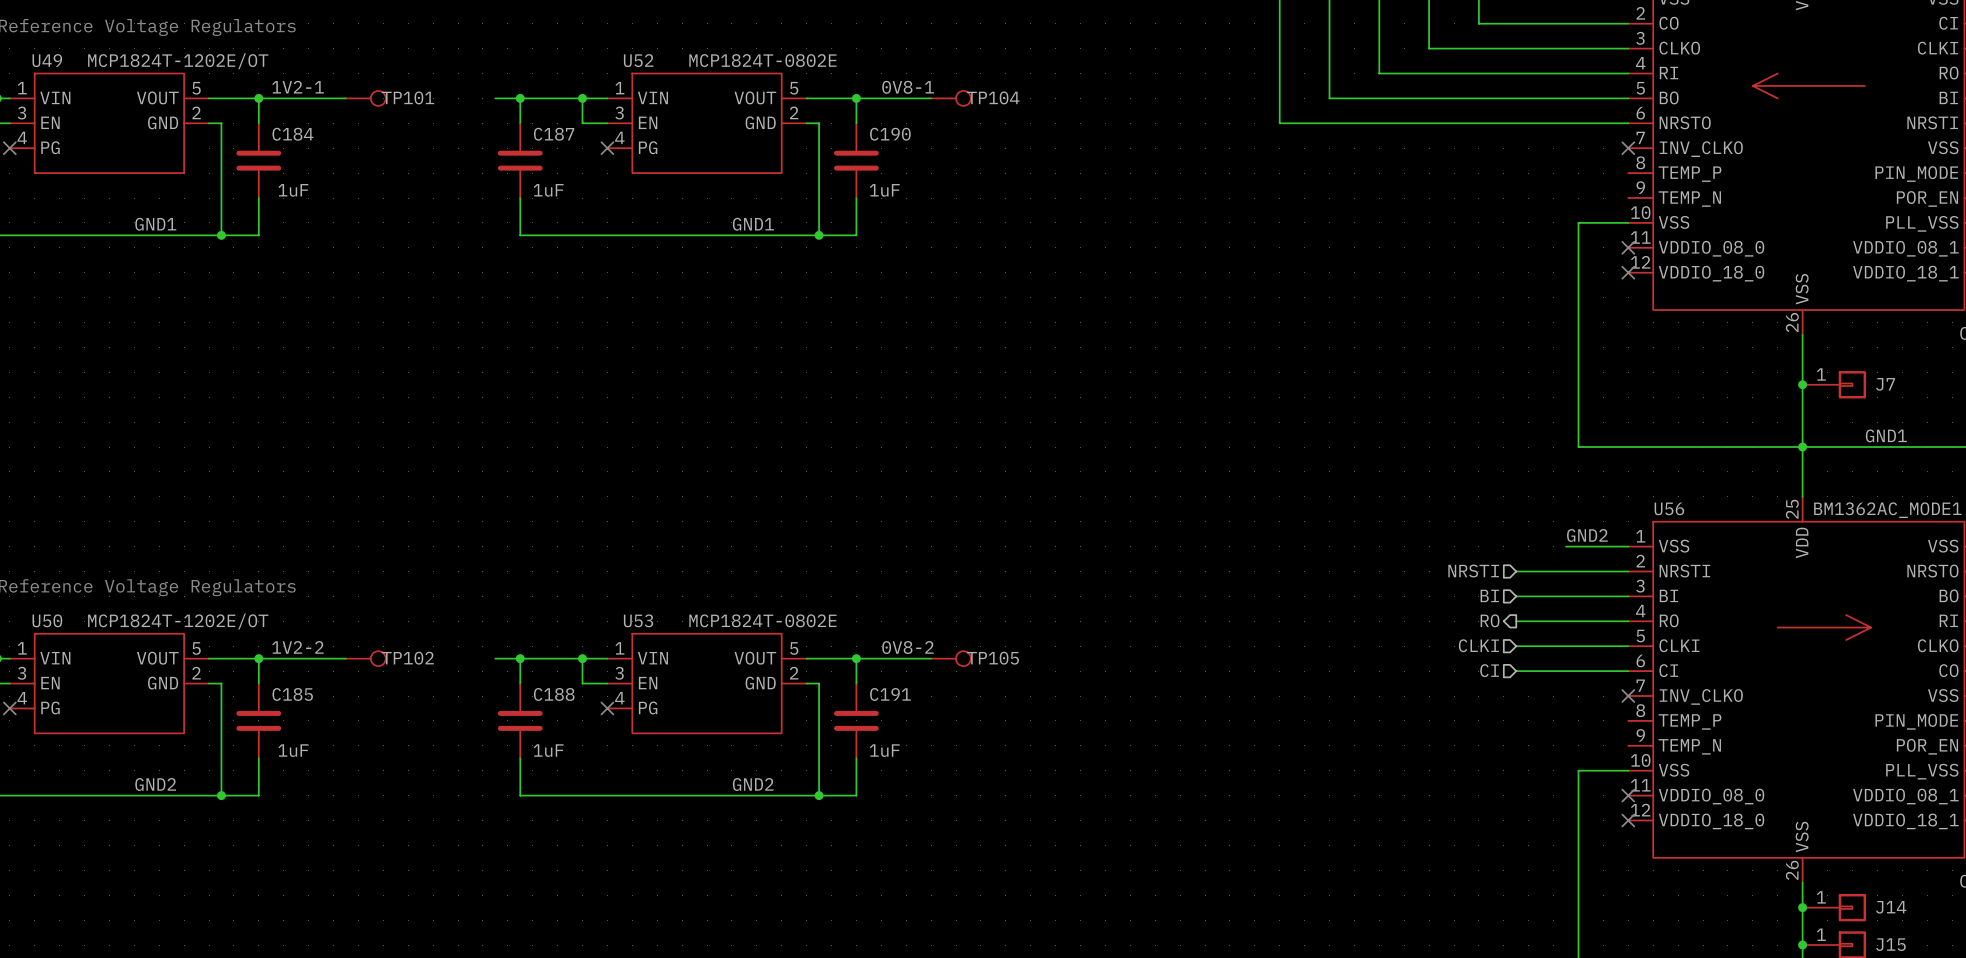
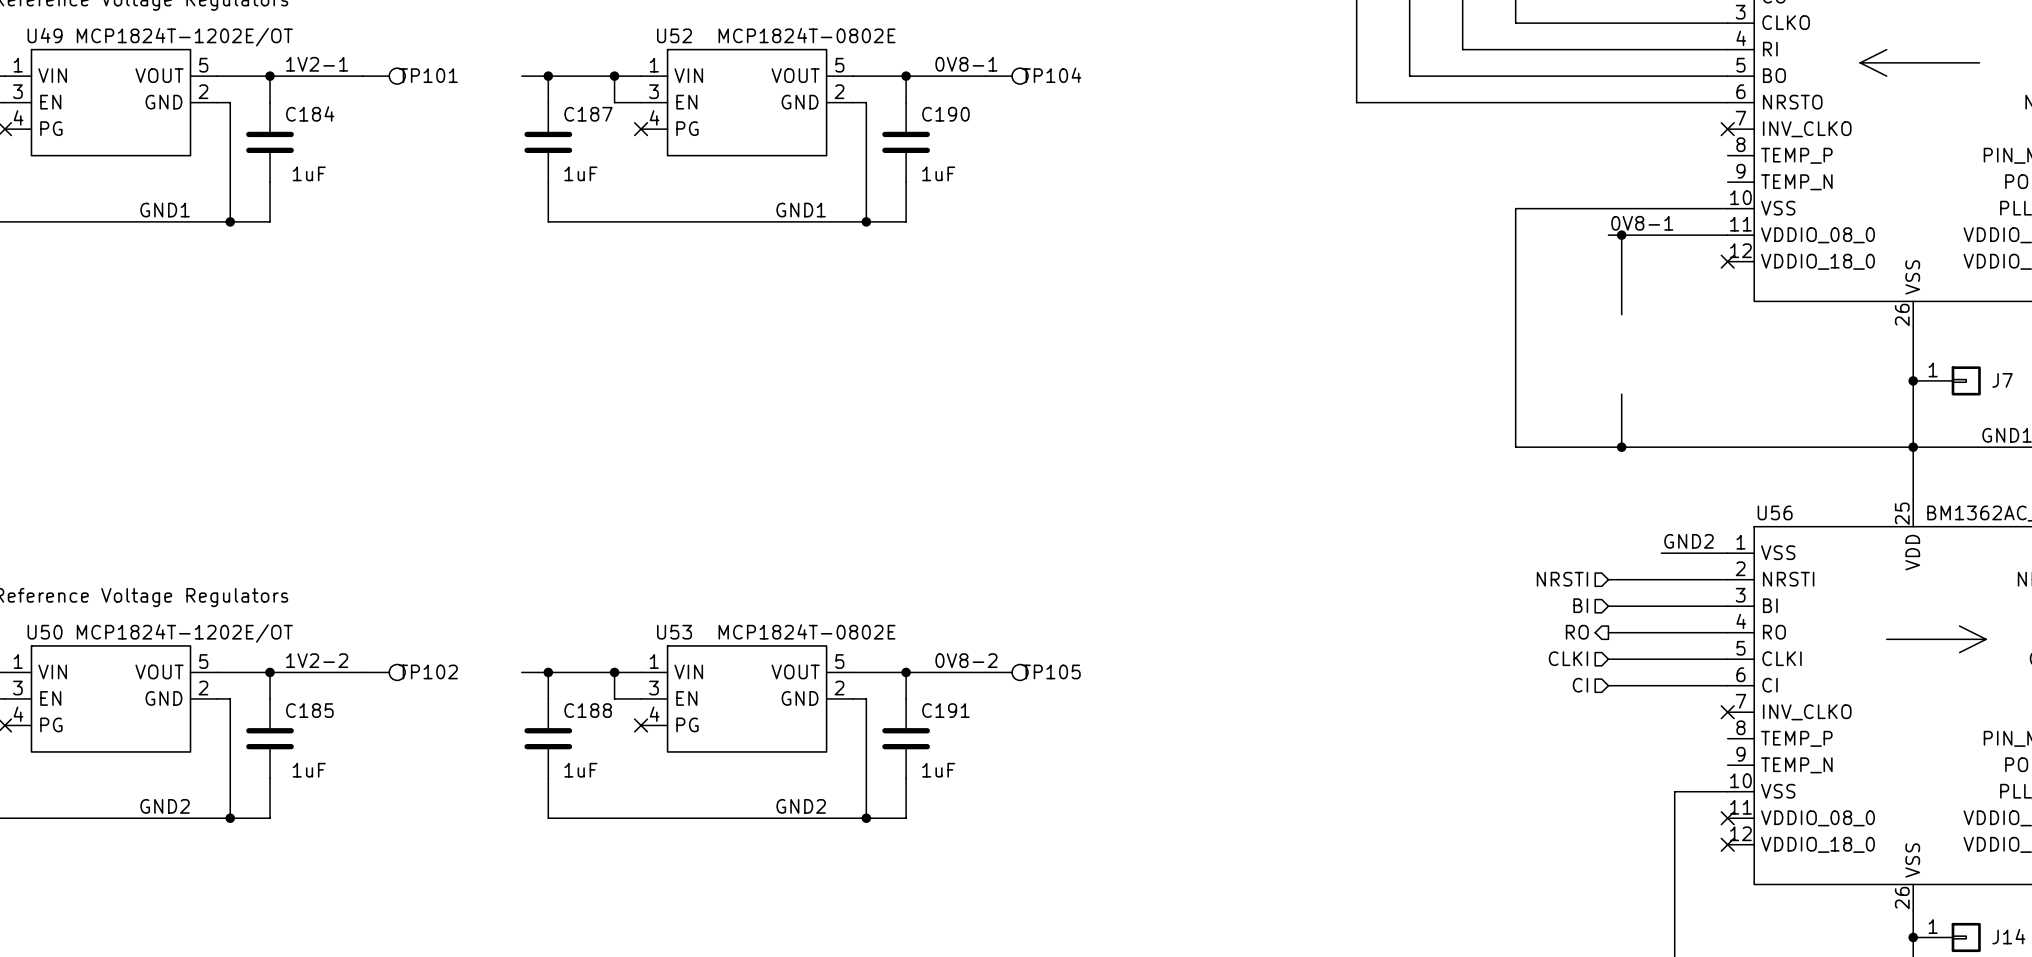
wire: (1578, 222) (1578, 447) -> (1674, 208) (1515, 208) (1515, 447) (1674, 447)
label: none -> 0V8-1 (1642, 223)
wire: none -> (1608, 235) (1727, 235)
wire: none -> (1621, 235) (1621, 314)
junction: none -> (1621, 235)
no-connect mark: (1628, 247) -> none
wire: none -> (1621, 394) (1621, 447)
junction: none -> (1621, 447)

